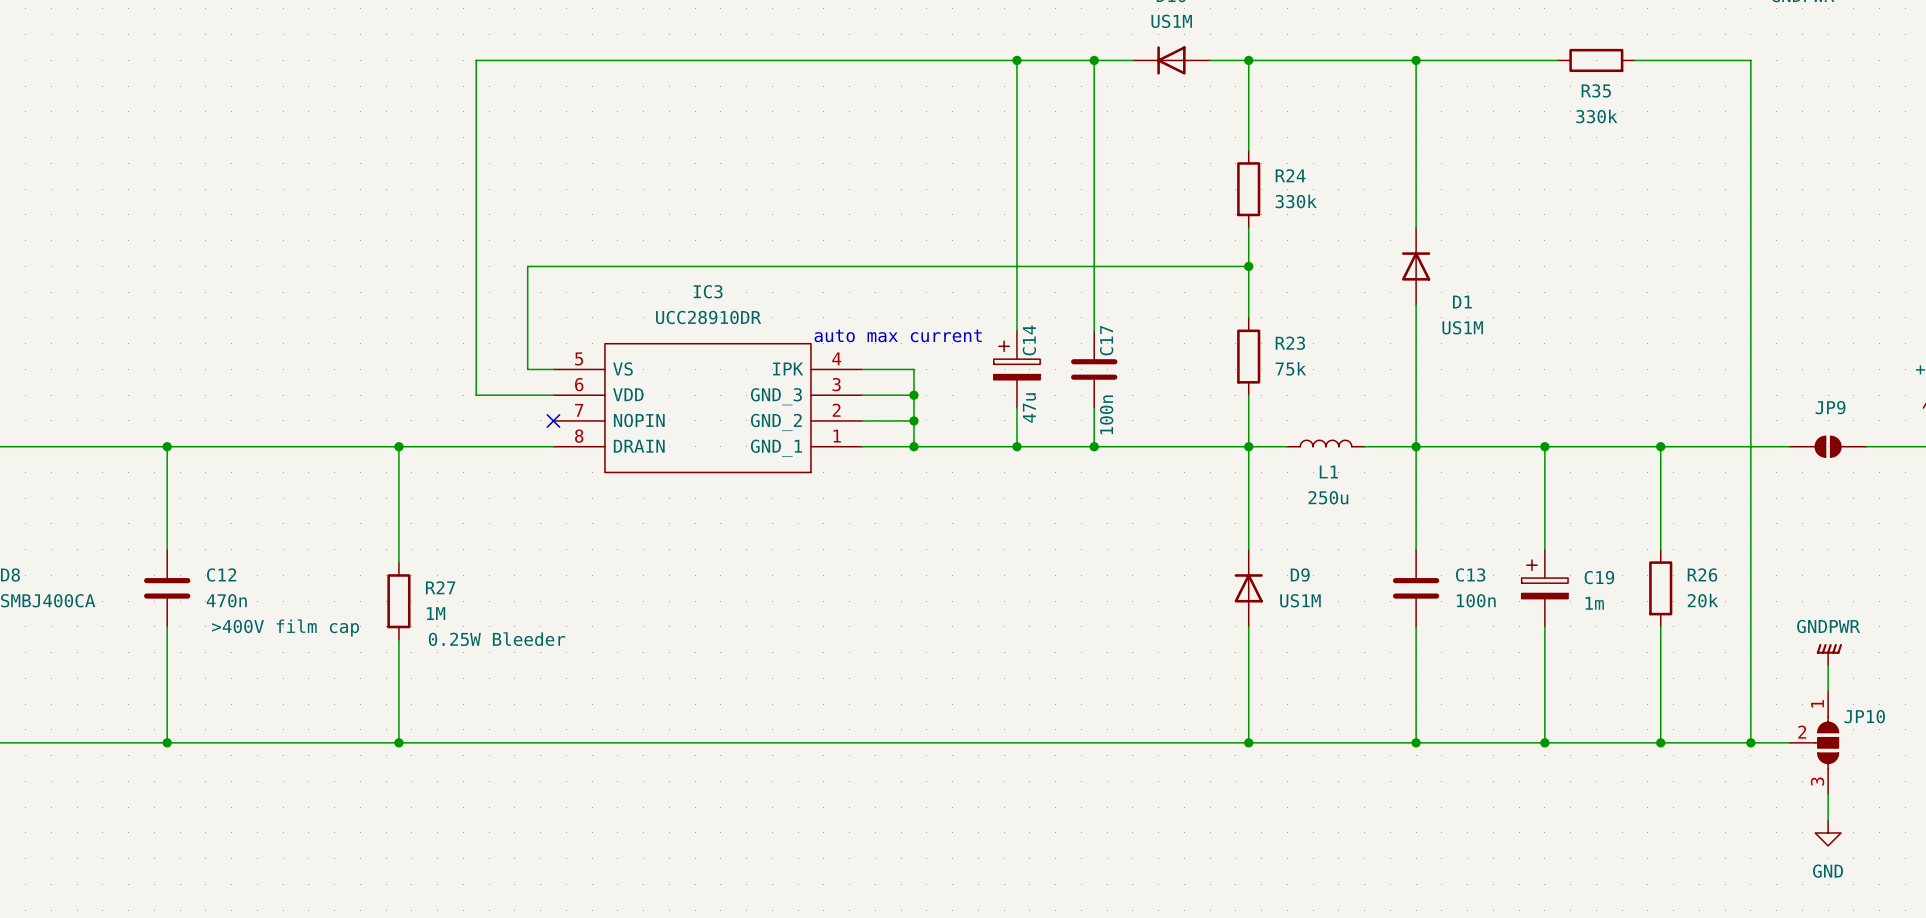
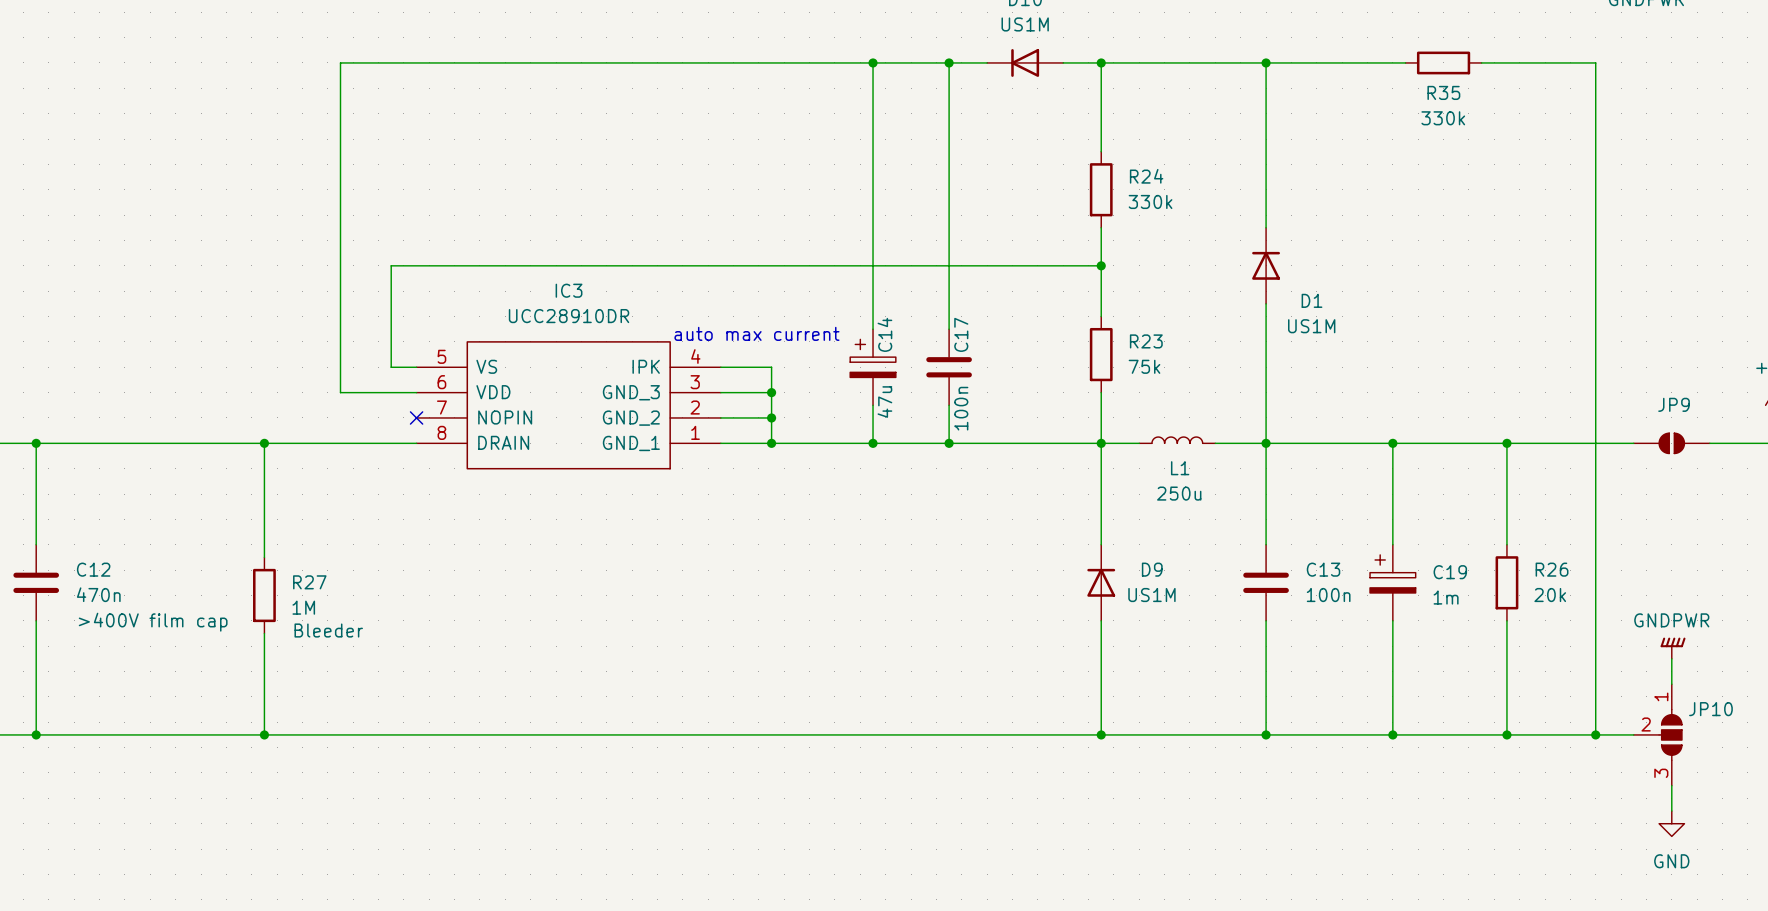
R27 text: 0.25W Bleeder (497, 639) -> Bleeder (328, 630)

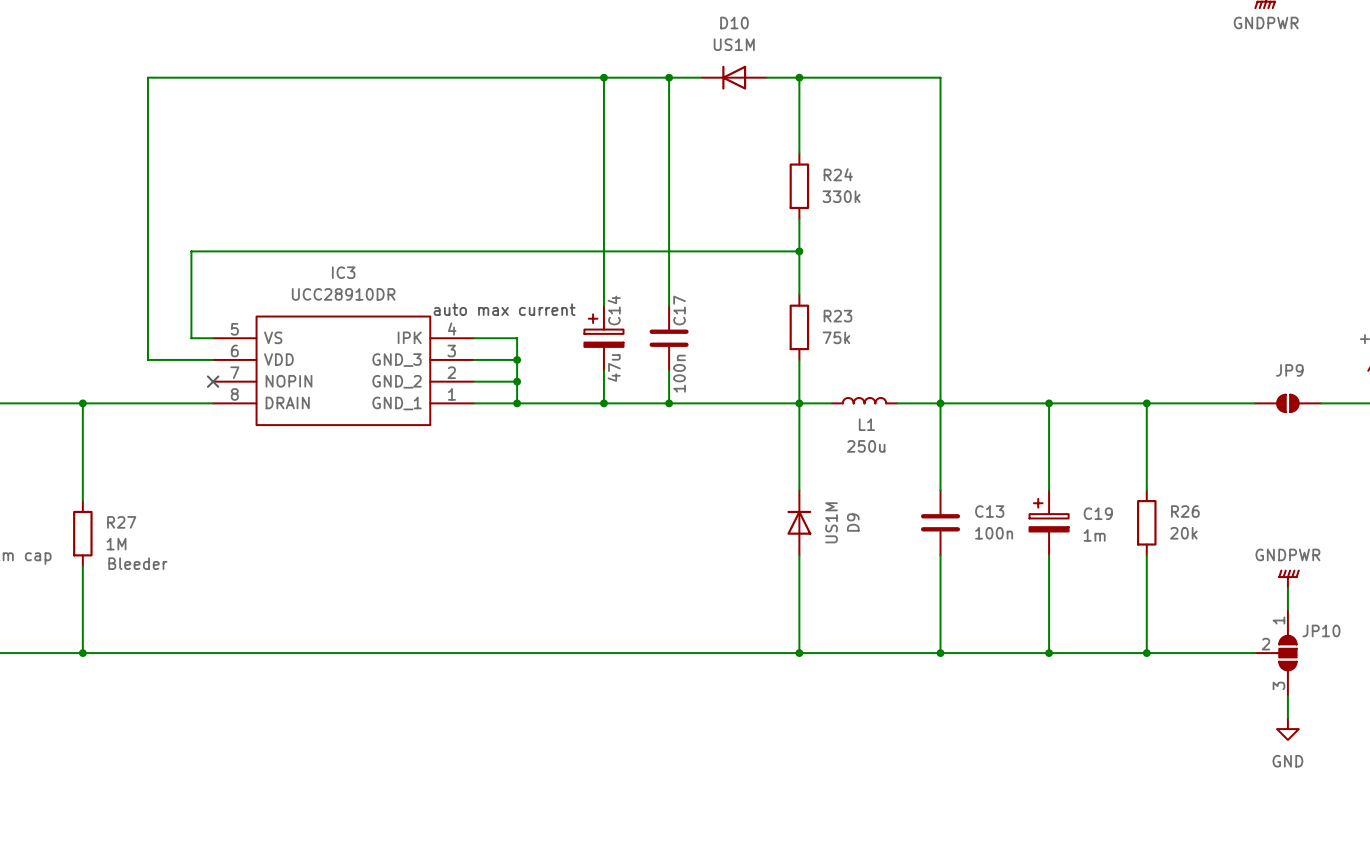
wire: (1266, 62) (1405, 62) -> none
junction: (1266, 62) -> none
R35: 330k (1443, 62) -> none
wire: (1481, 62) (1595, 62) (1595, 734) -> none
D1: US1M (1266, 265) -> none
D9 name rotation: 0° (1152, 569) -> 90° counterclockwise (853, 522)
D9 value rotation: 0° (1151, 595) -> 90° counterclockwise (831, 522)
junction: (1595, 734) -> none

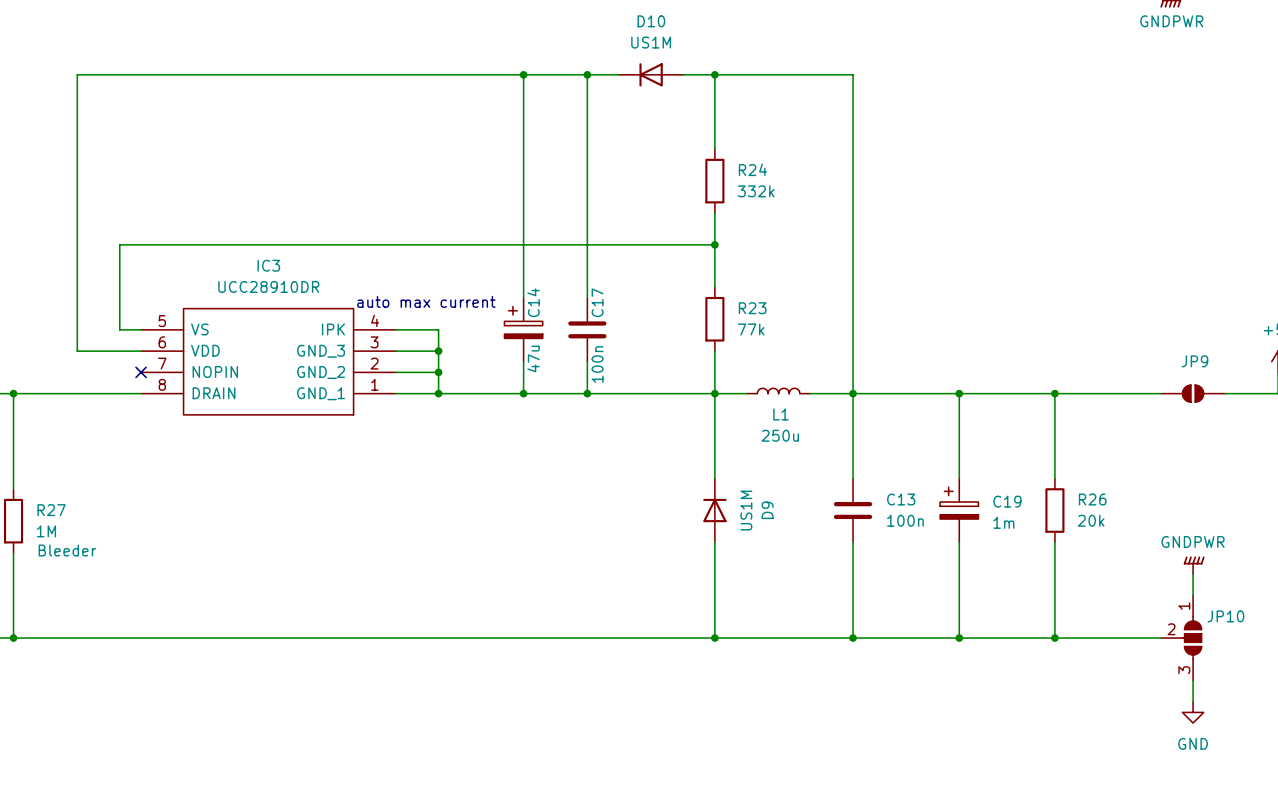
R24 value: 330k (841, 196) -> 332k (756, 191)
R23 value: 75k (836, 337) -> 77k (751, 329)

